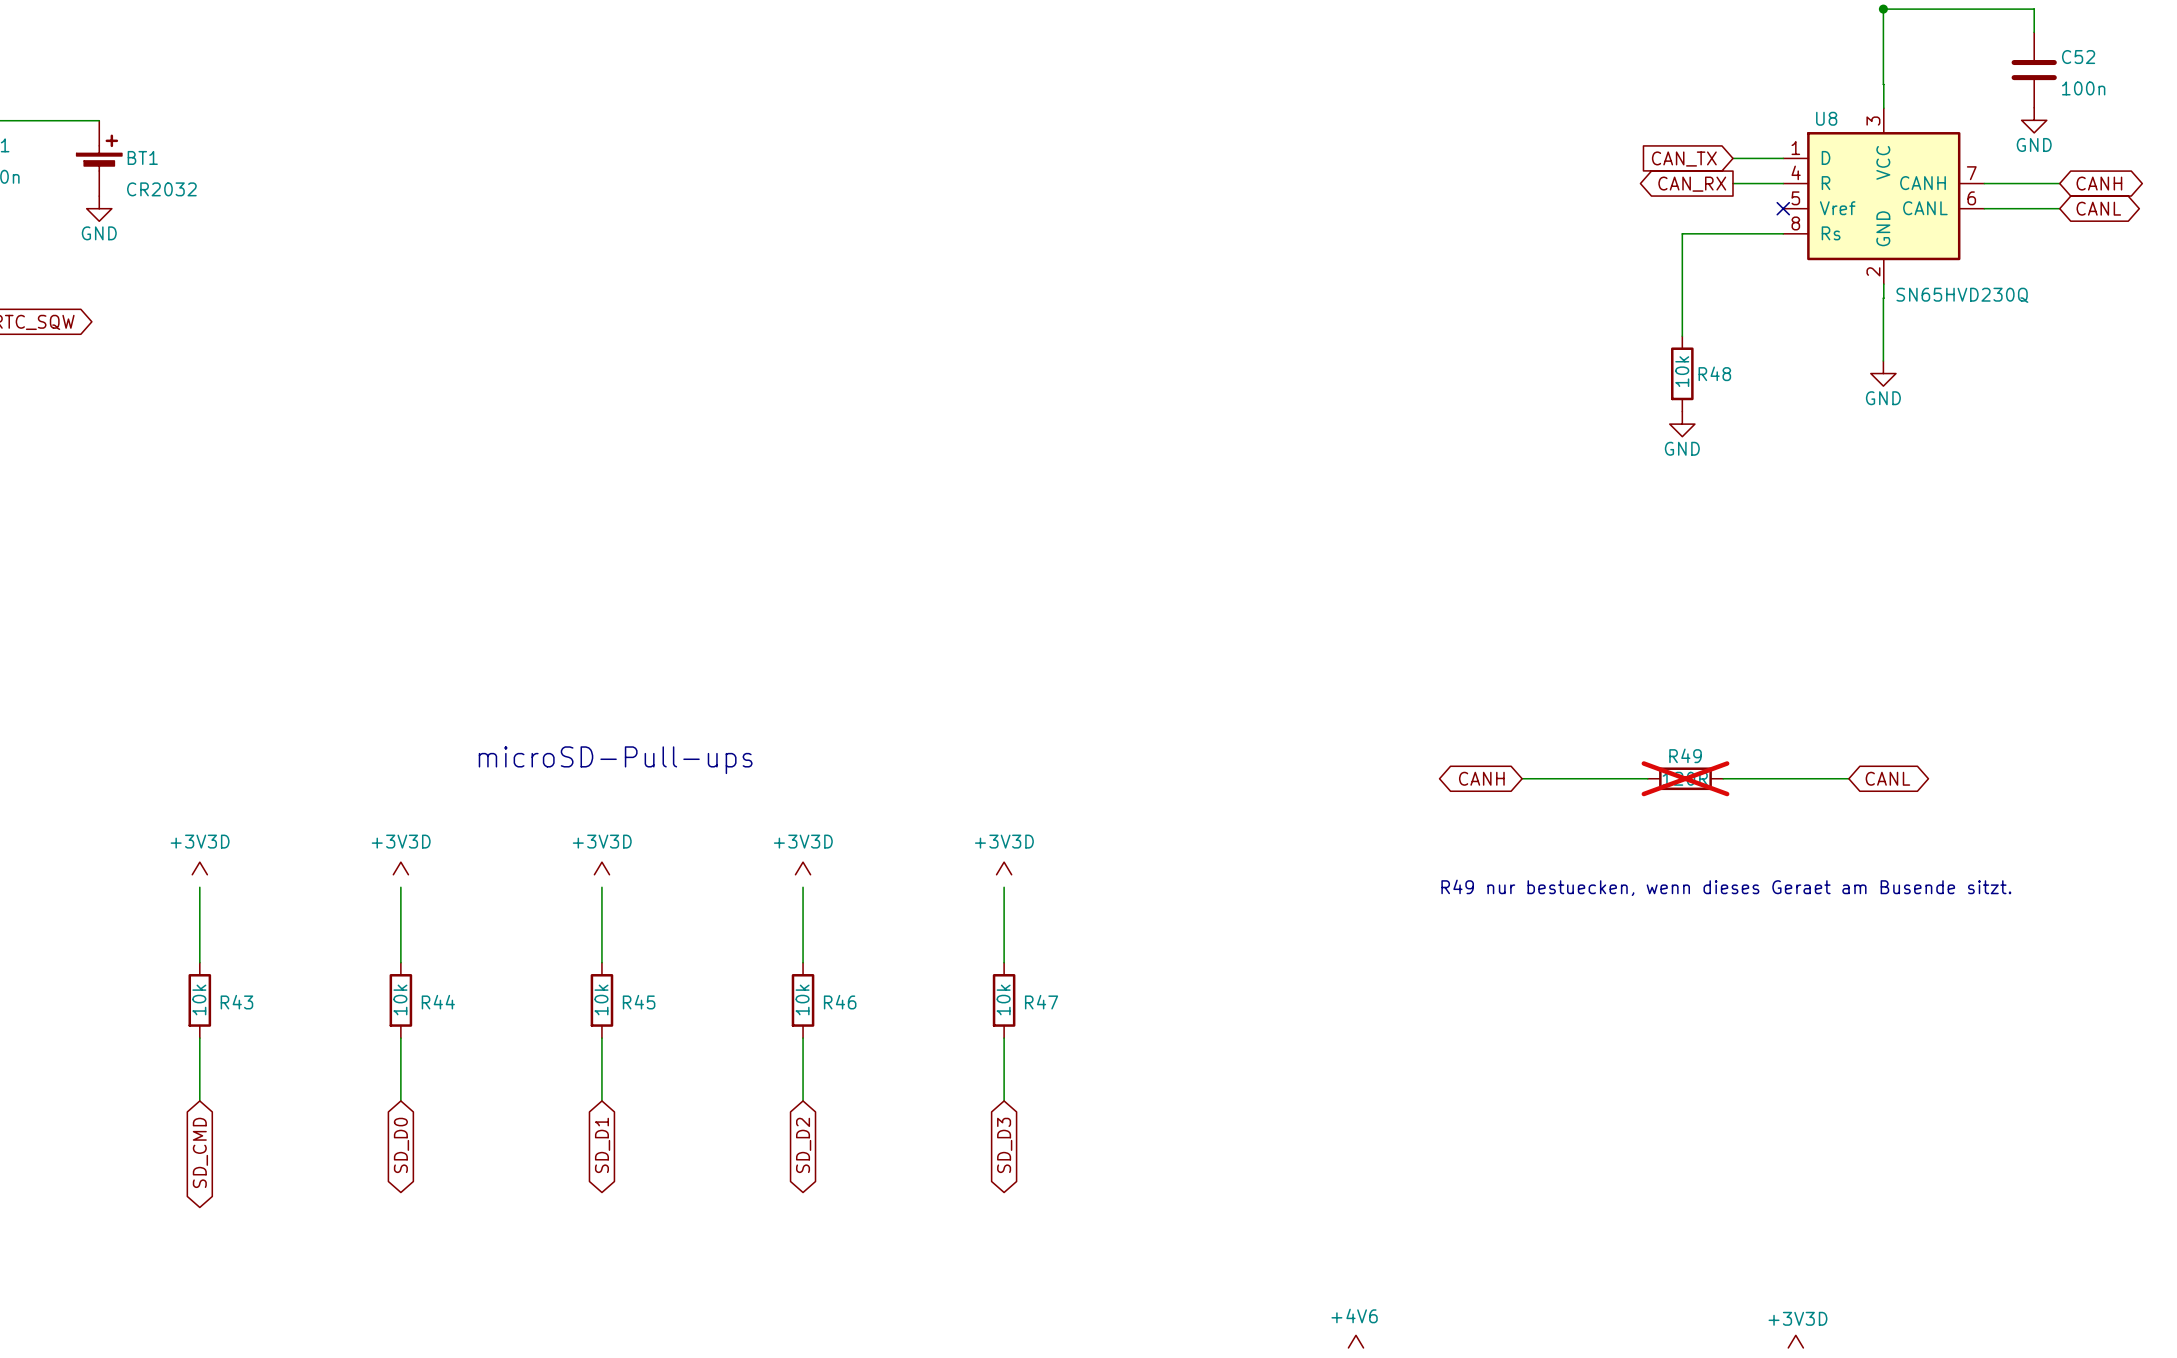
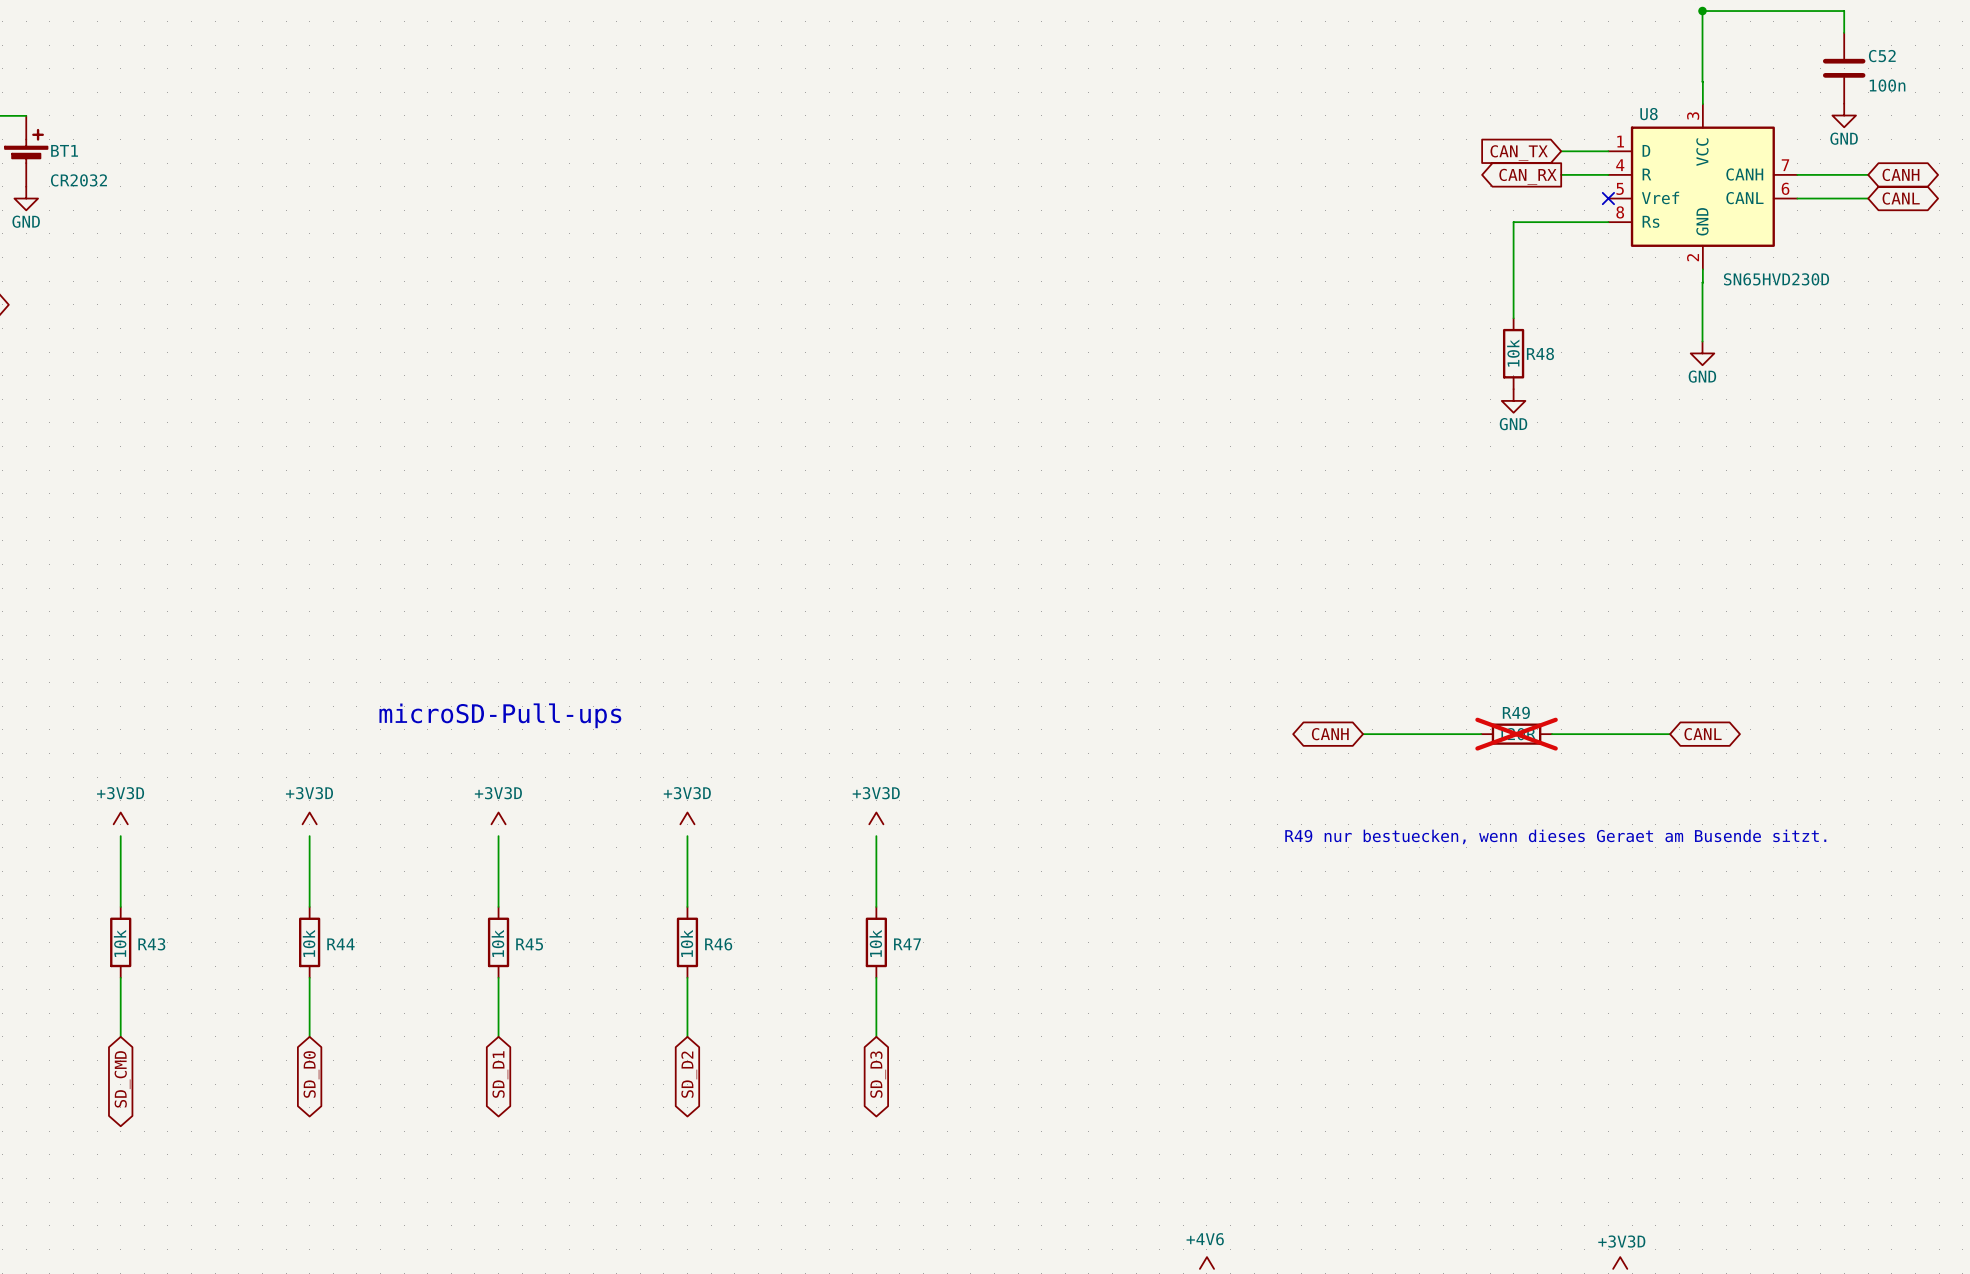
U8 value: SN65HVD230Q (1962, 295) -> SN65HVD230D (1776, 279)

